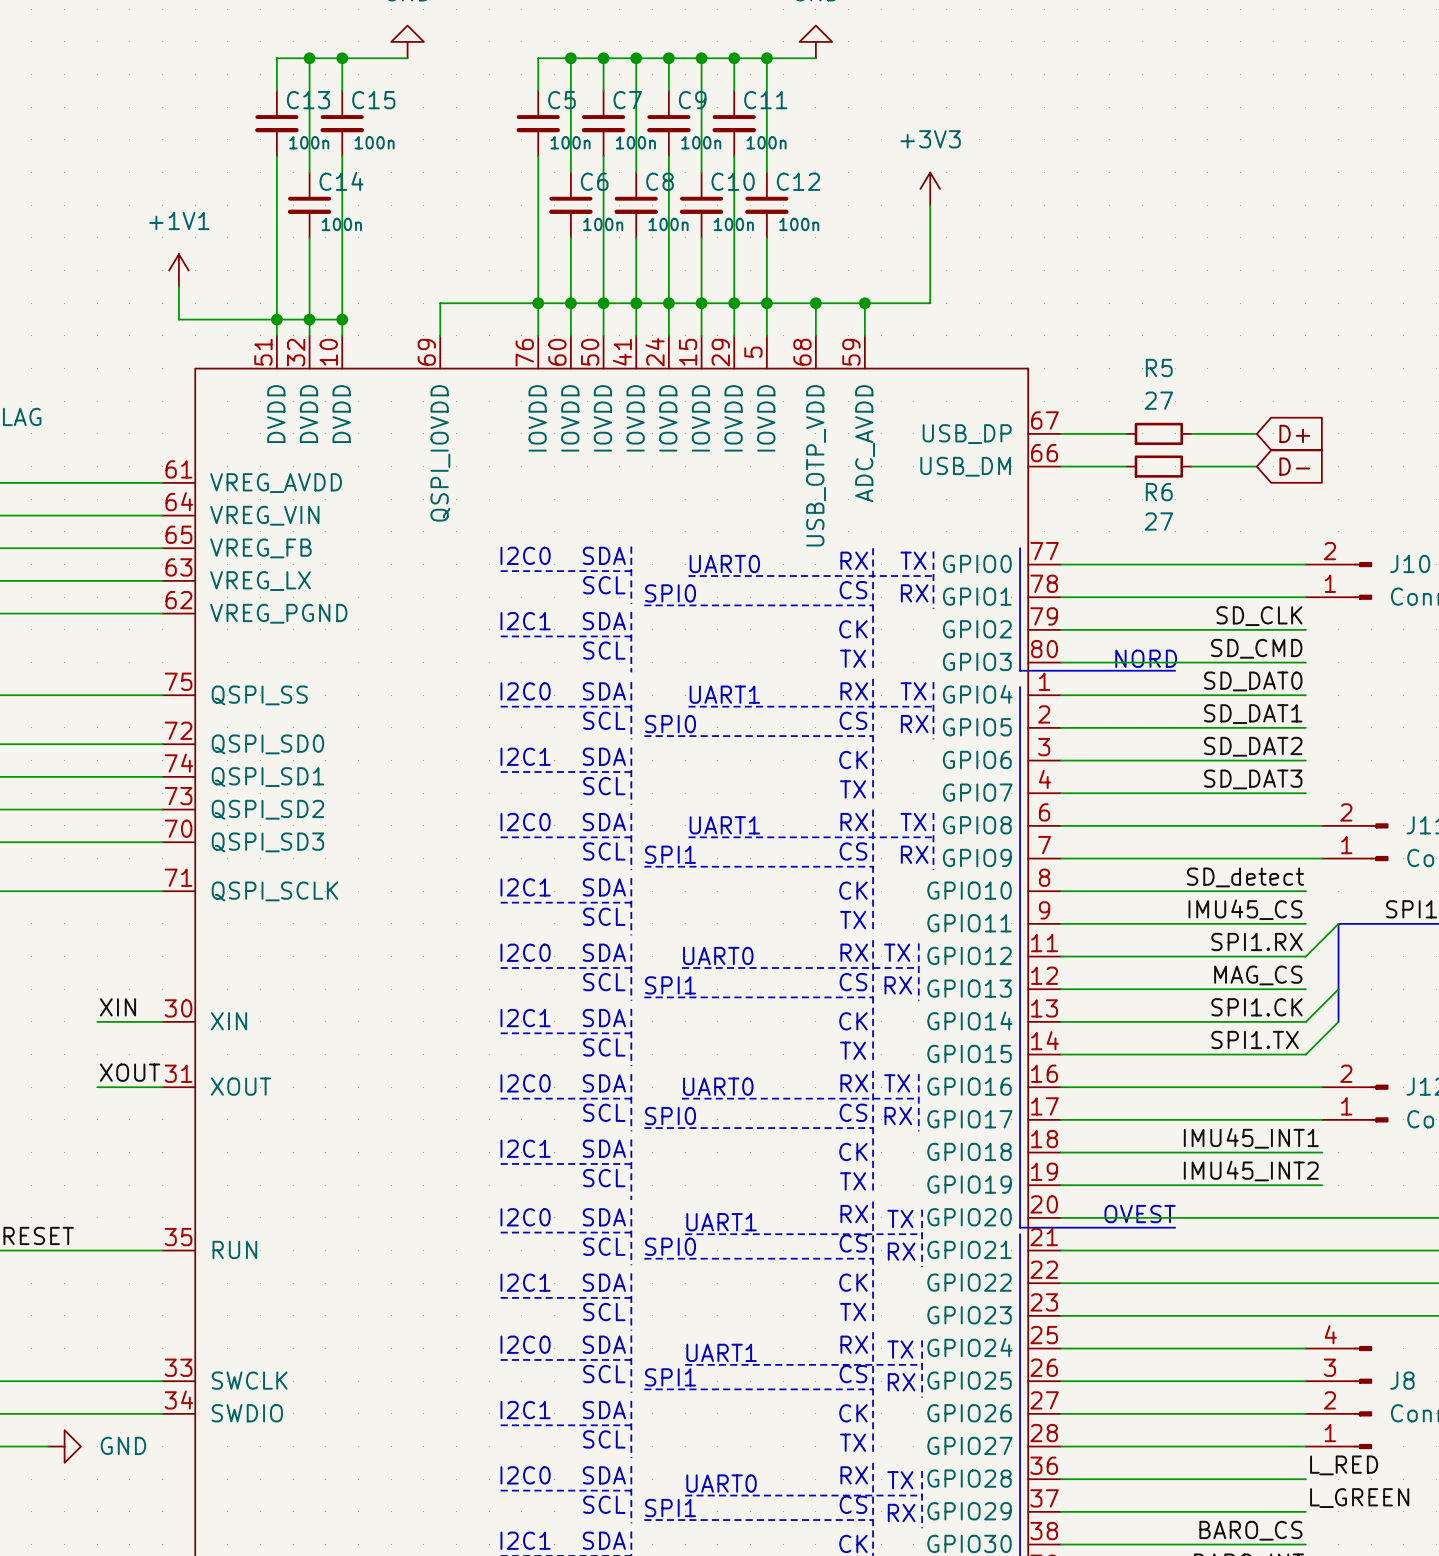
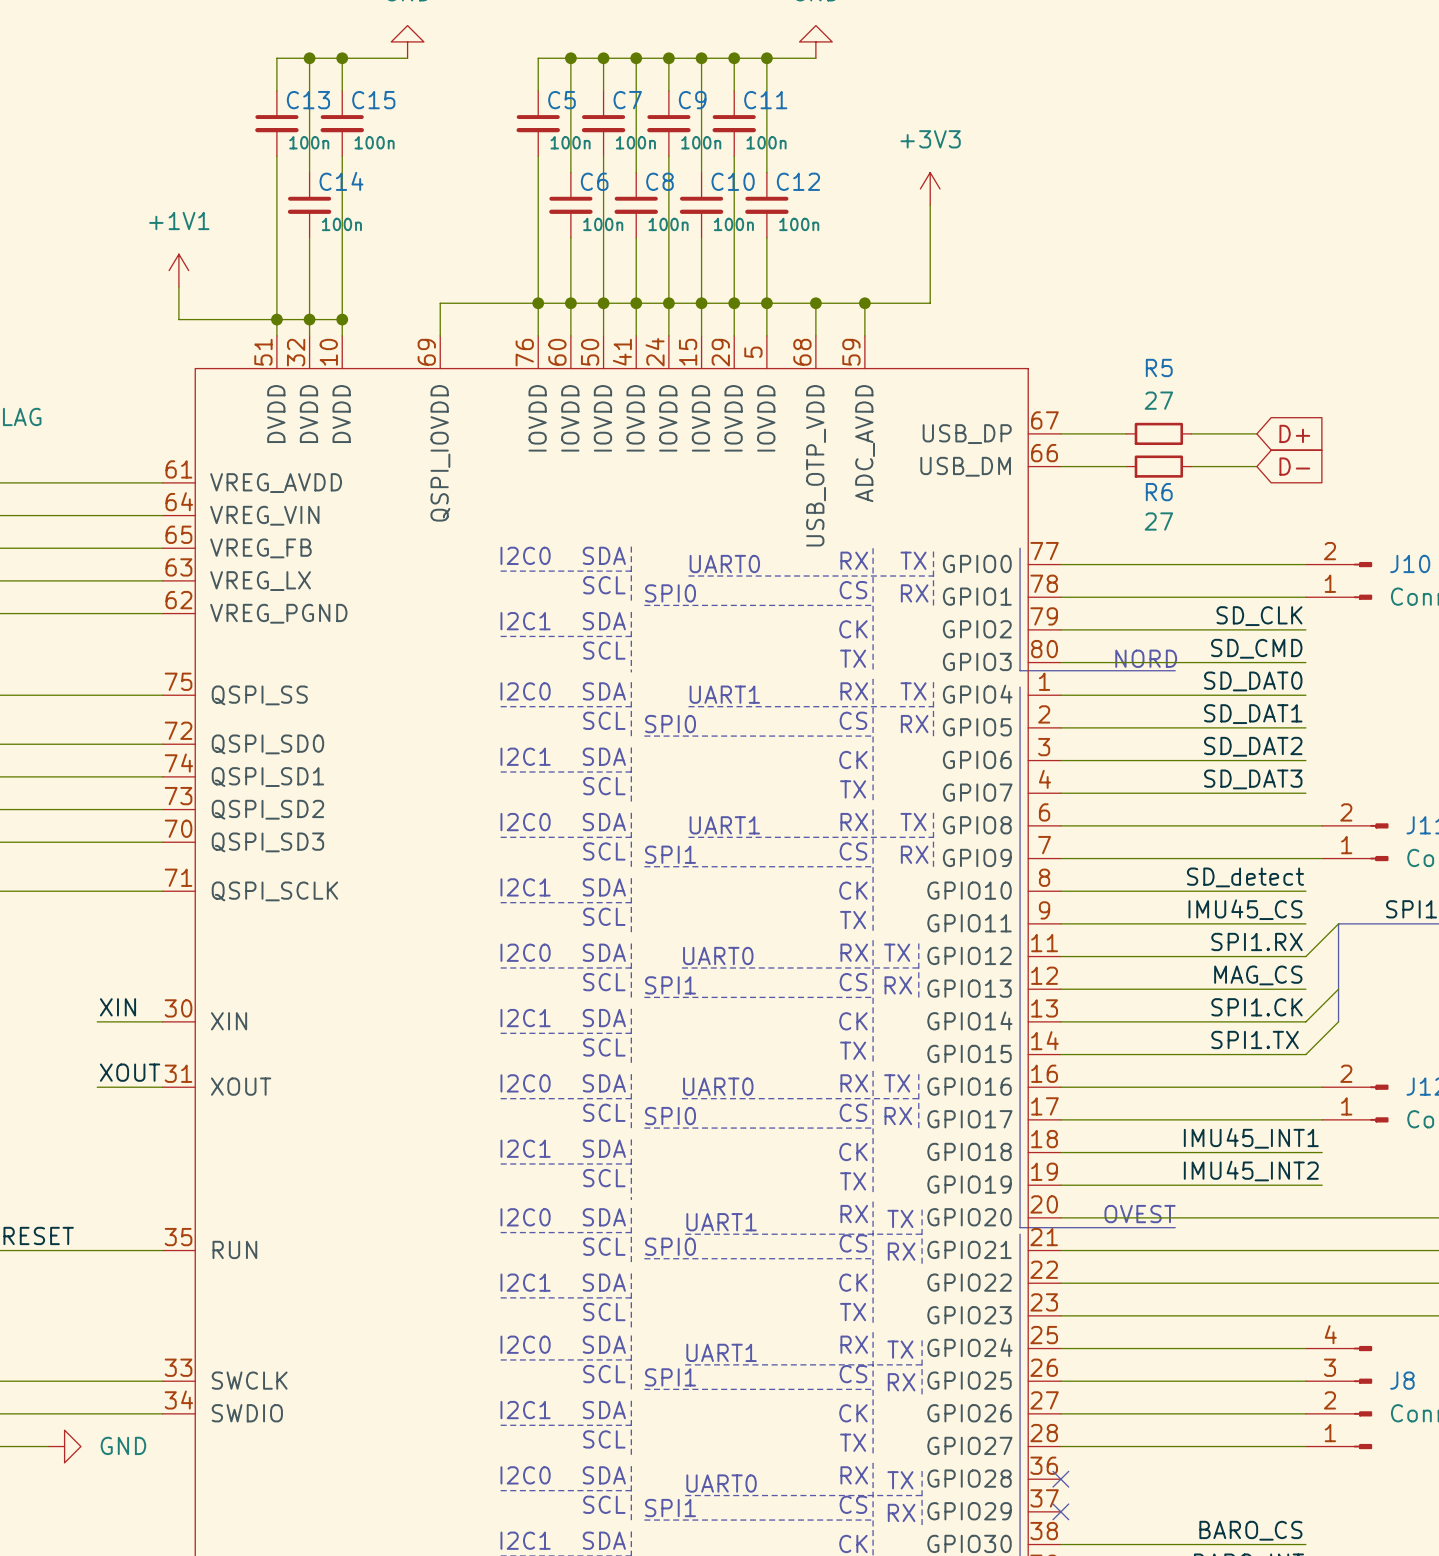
label: L_RED (1344, 1465) -> none
wire: (1060, 1479) (1305, 1479) -> none
no-connect mark: none -> (1060, 1479)
label: L_GREEN (1359, 1498) -> none
wire: (1060, 1511) (1305, 1511) -> none
no-connect mark: none -> (1060, 1511)

